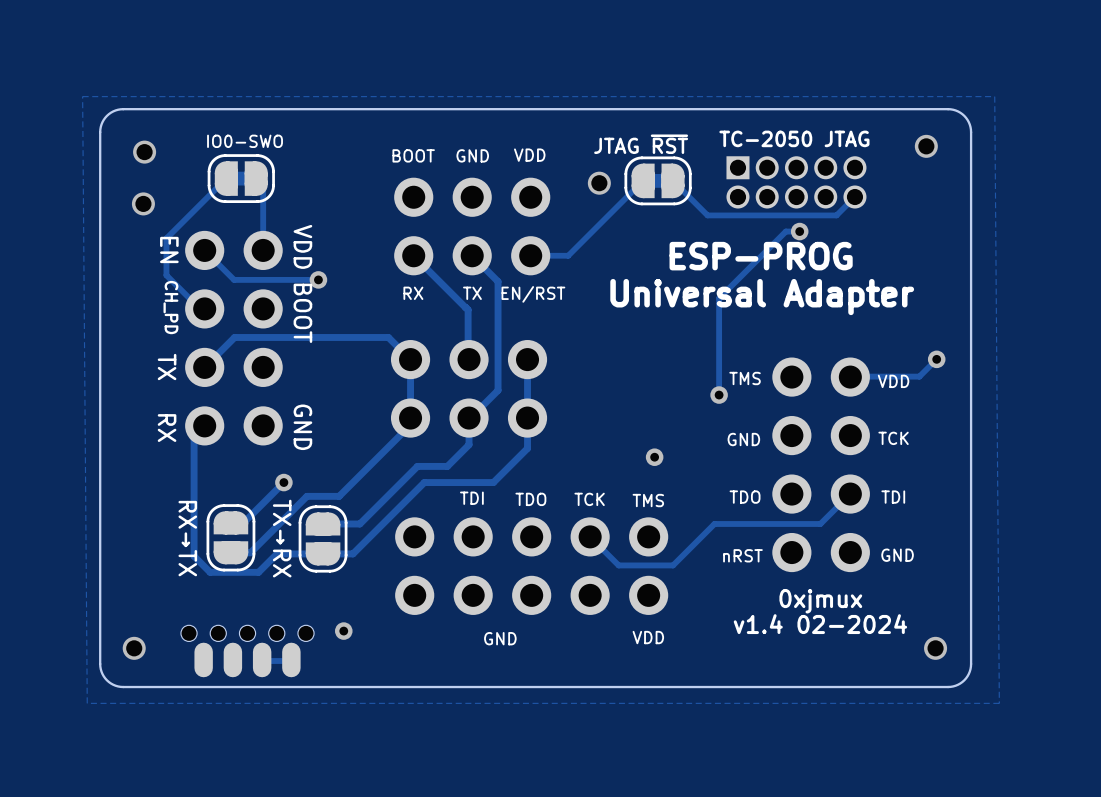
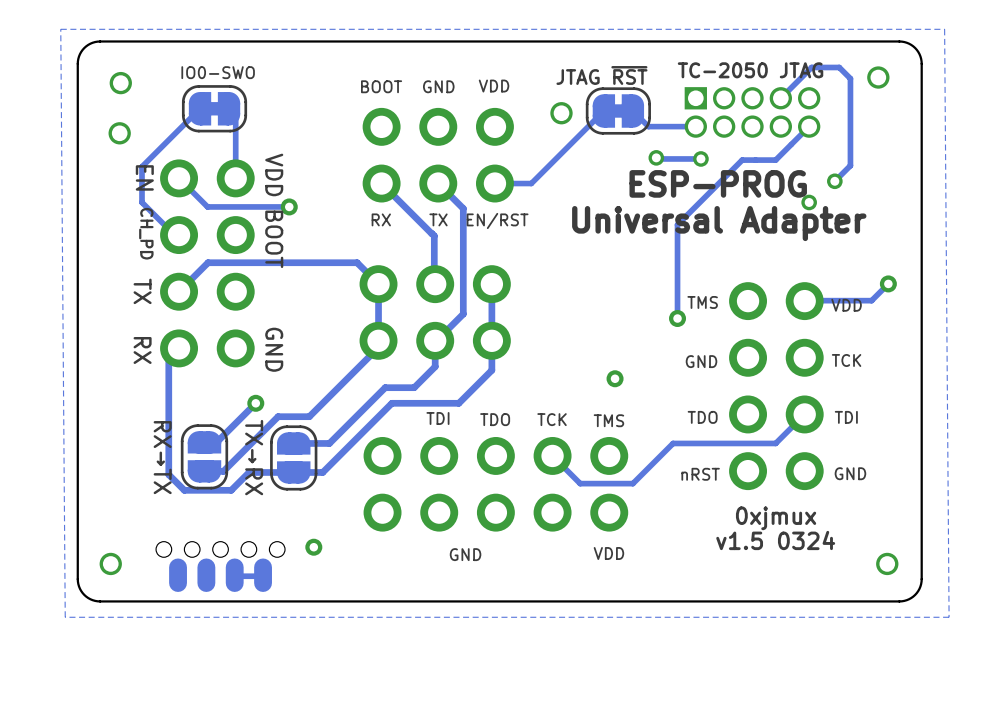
track: none -> (780, 98) (811, 67) (839, 67) (850, 78) (850, 165) (834, 181)
track: (689, 197) (707, 215) (836, 215) -> (648, 126) (695, 126)
track: none -> (791, 144) (775, 160) (755, 160)
track: none -> (656, 157) (700, 158)
via: none -> (656, 157)
via: none -> (700, 158)
via: (799, 231) -> none
via: none -> (834, 181)
via: none -> (809, 202)
text: v1.4 02-2024 (820, 624) -> v1.5 0324 (775, 540)

